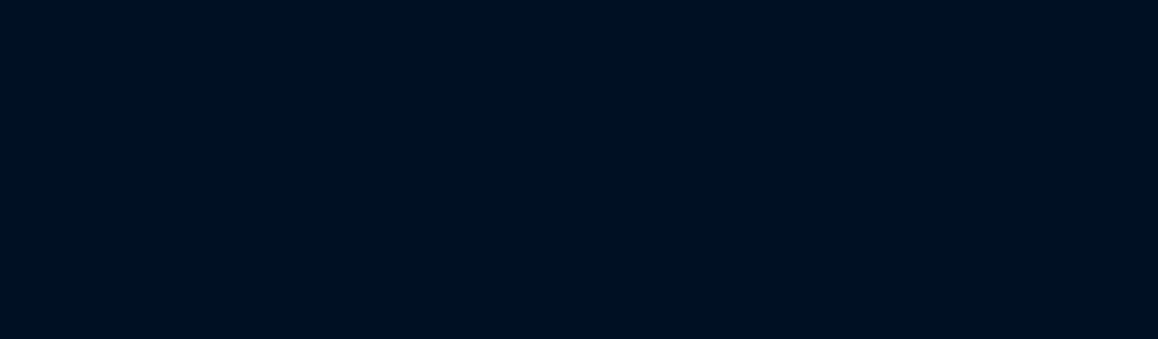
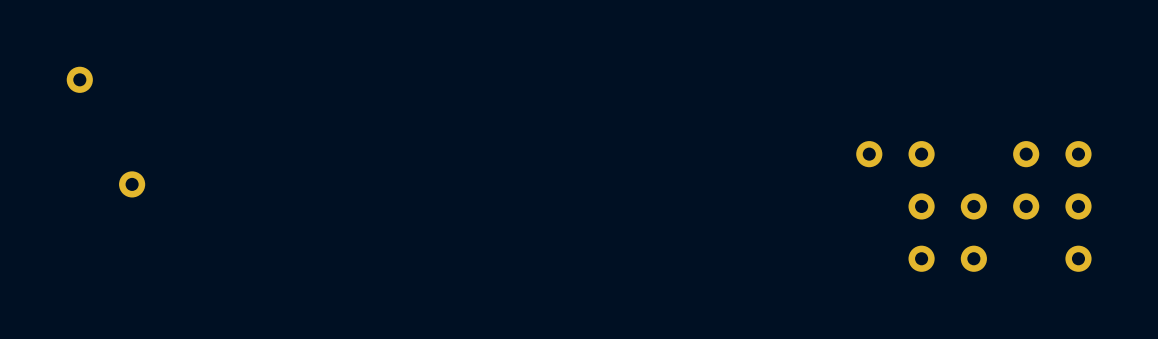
part: none -> (79, 79)
part: none -> (869, 154)
part: none -> (921, 154)
part: none -> (1026, 154)
part: none -> (1078, 154)
part: none -> (132, 184)
part: none -> (921, 206)
part: none -> (973, 206)
part: none -> (1026, 206)
part: none -> (1078, 206)
part: none -> (921, 258)
part: none -> (973, 258)
part: none -> (1078, 258)

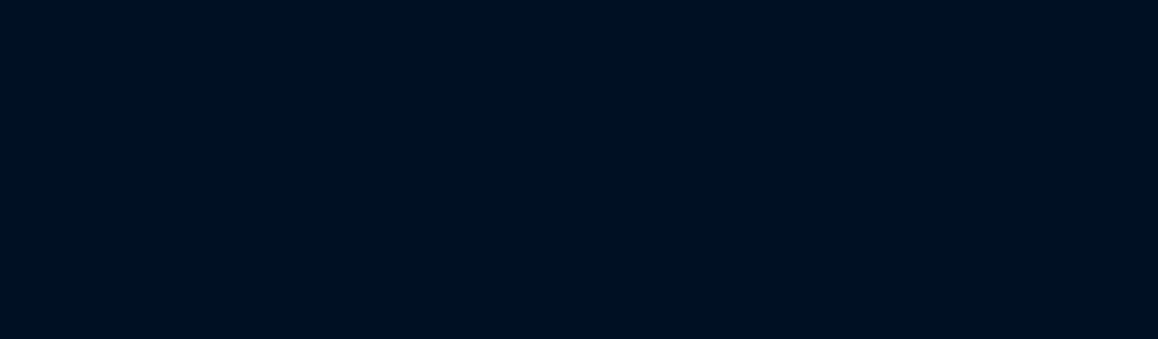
part: (79, 79) -> none
part: (869, 154) -> none
part: (921, 154) -> none
part: (1026, 154) -> none
part: (1078, 154) -> none
part: (132, 184) -> none
part: (921, 206) -> none
part: (973, 206) -> none
part: (1026, 206) -> none
part: (1078, 206) -> none
part: (921, 258) -> none
part: (973, 258) -> none
part: (1078, 258) -> none

